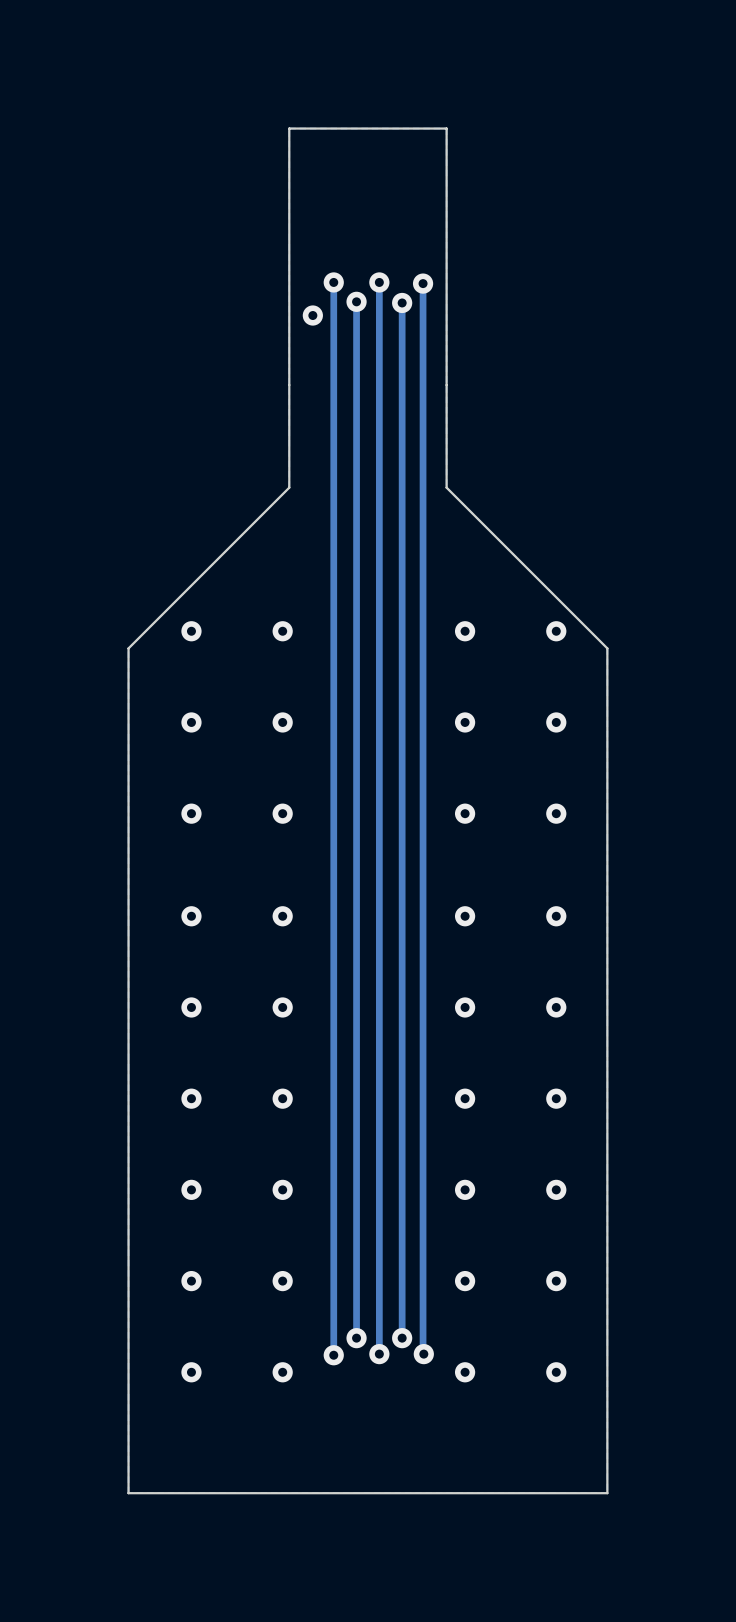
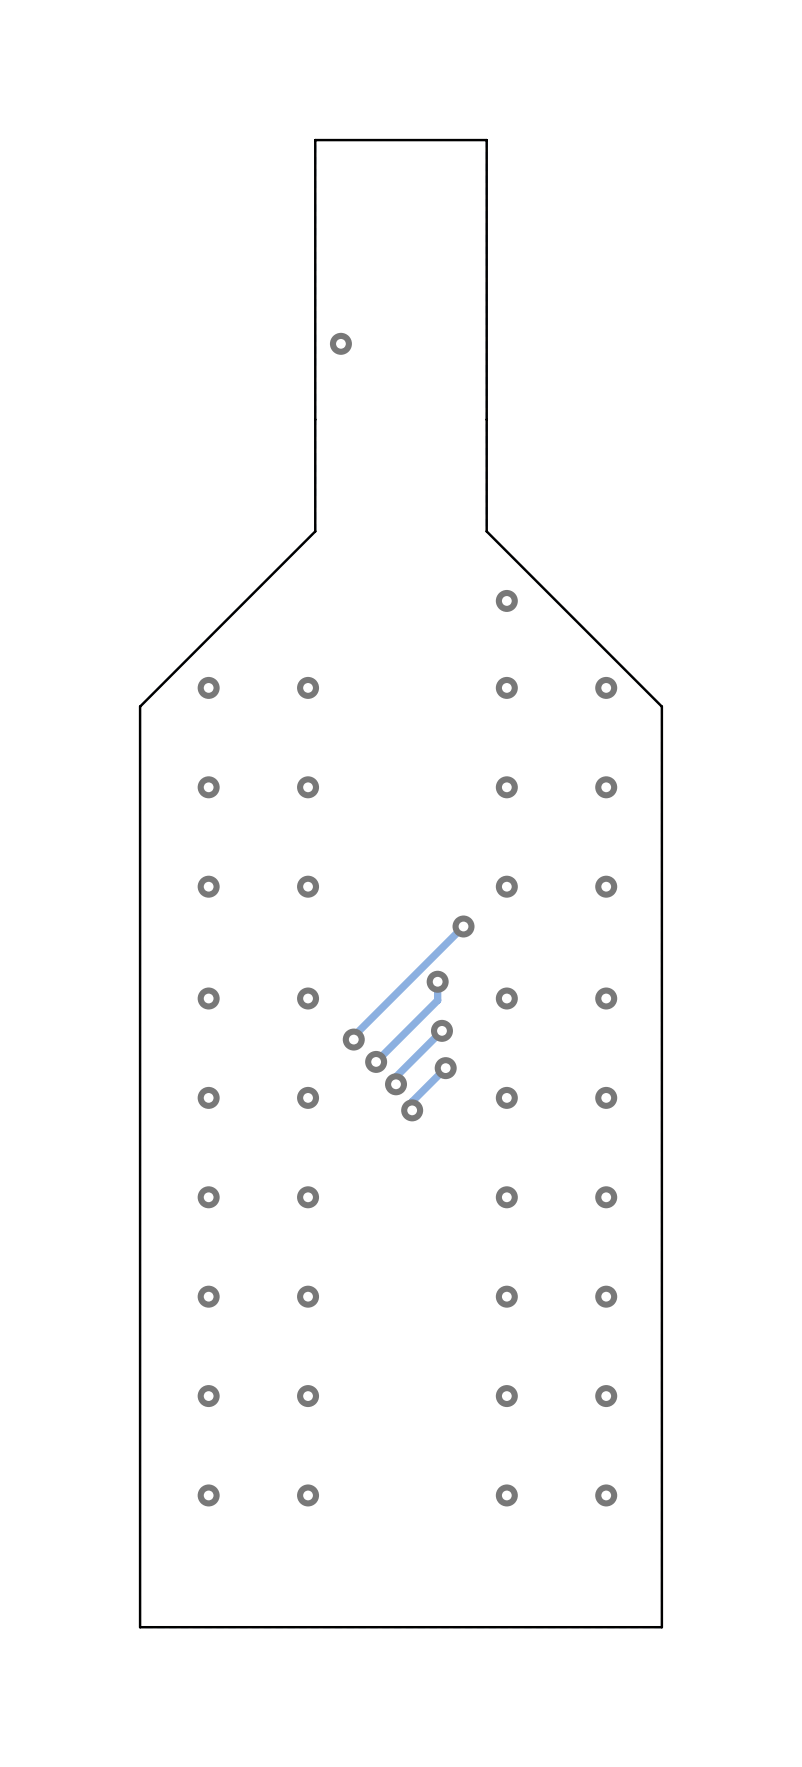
track: (333, 282) (333, 1355) -> none
via: (333, 282) -> none
track: (379, 282) (379, 1354) -> none
via: (379, 282) -> none
track: (423, 283) (423, 1354) -> none
via: (423, 283) -> none
track: (356, 301) (356, 1338) -> none
via: (356, 301) -> none
track: (402, 302) (402, 1338) -> none
via: (402, 302) -> none
via: none -> (506, 600)
track: none -> (463, 926) (353, 1036) (353, 1039)
via: none -> (463, 926)
track: none -> (437, 981) (437, 1000) (376, 1061)
via: none -> (437, 981)
track: none -> (441, 1030) (396, 1076) (396, 1084)
via: none -> (441, 1030)
via: none -> (353, 1039)
via: none -> (376, 1061)
track: none -> (445, 1068) (412, 1101) (412, 1110)
via: none -> (445, 1068)
via: none -> (396, 1084)
via: none -> (412, 1110)
via: (356, 1338) -> none
via: (402, 1338) -> none
via: (379, 1354) -> none
via: (423, 1354) -> none
via: (333, 1355) -> none

